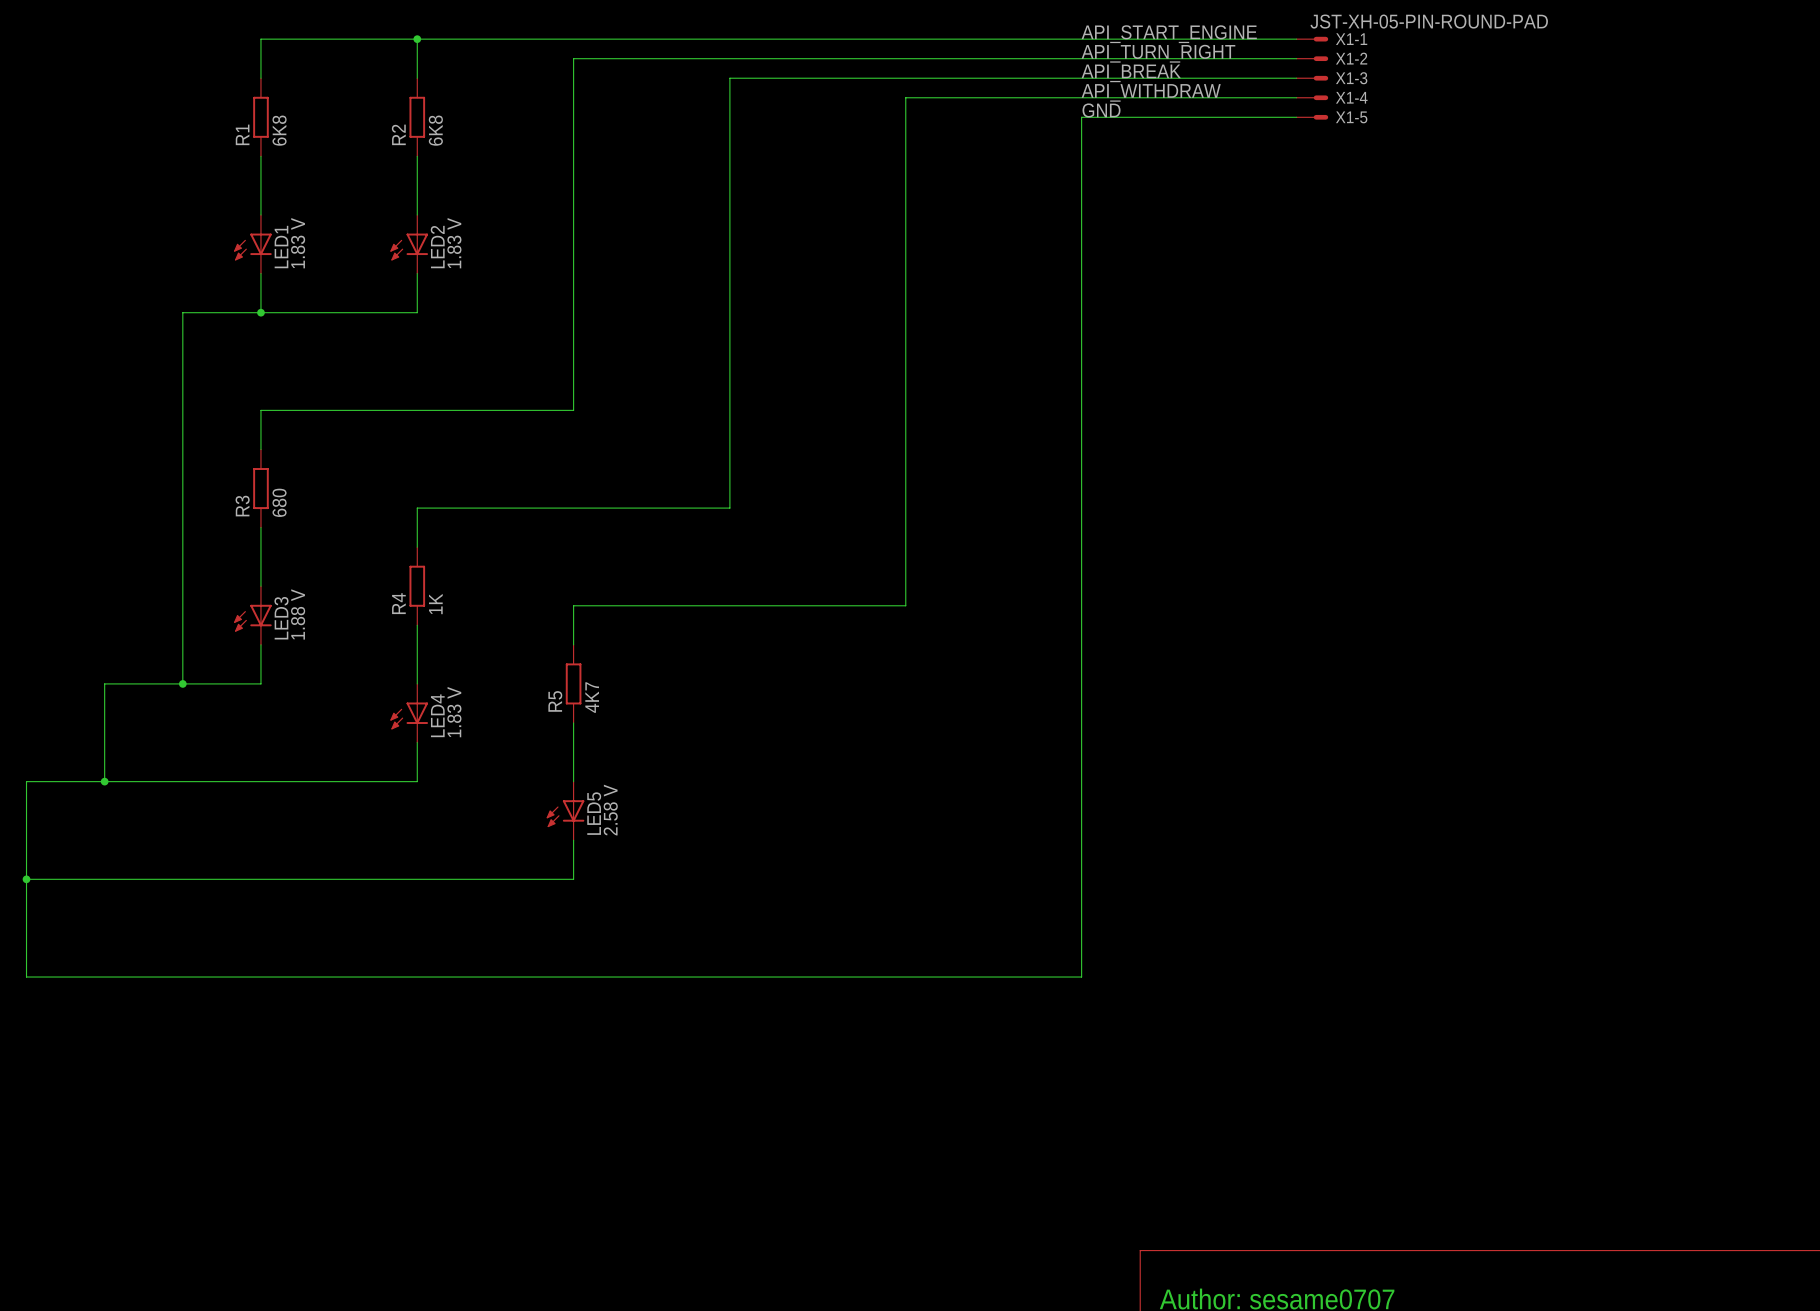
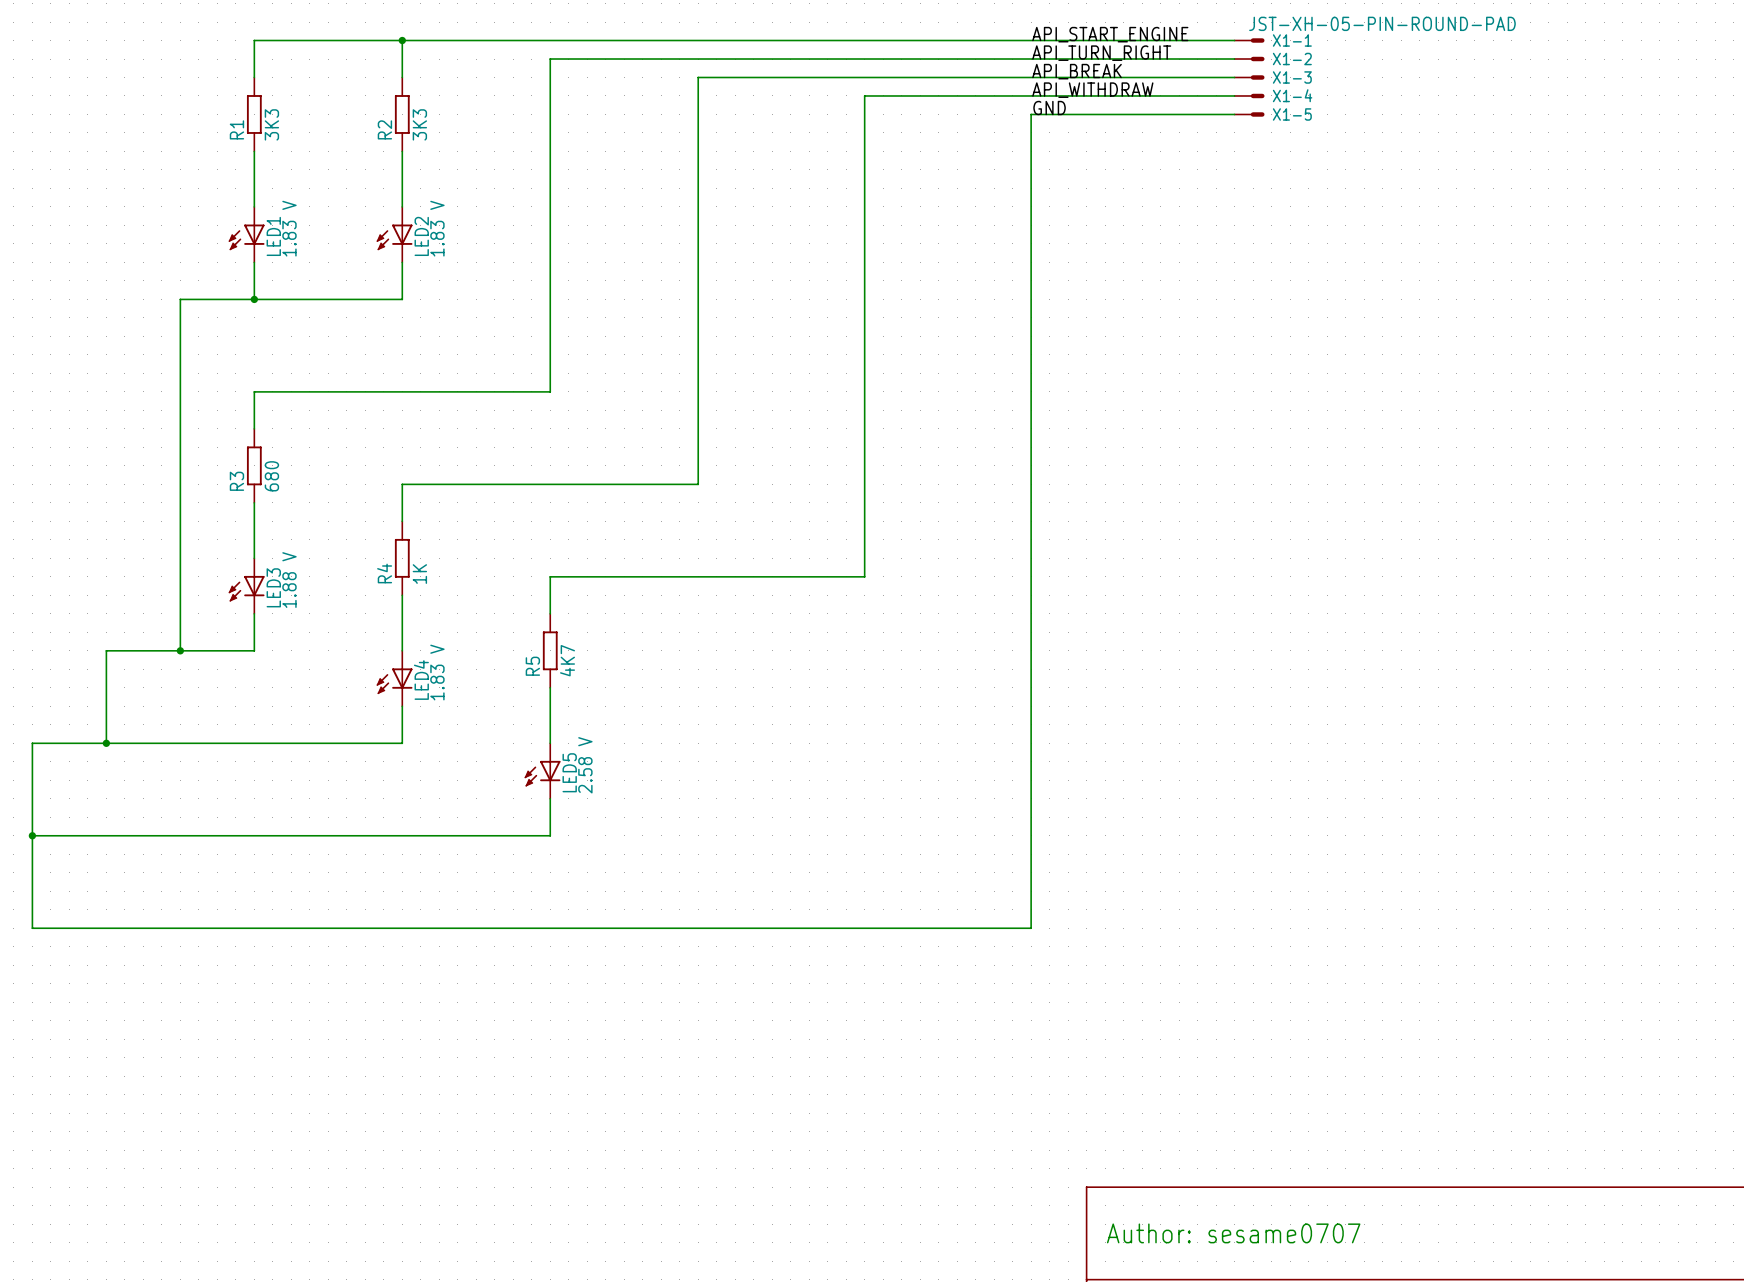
R1 value: 6K8 (279, 130) -> 3K3 (271, 124)
R2 value: 6K8 (435, 130) -> 3K3 (419, 124)

